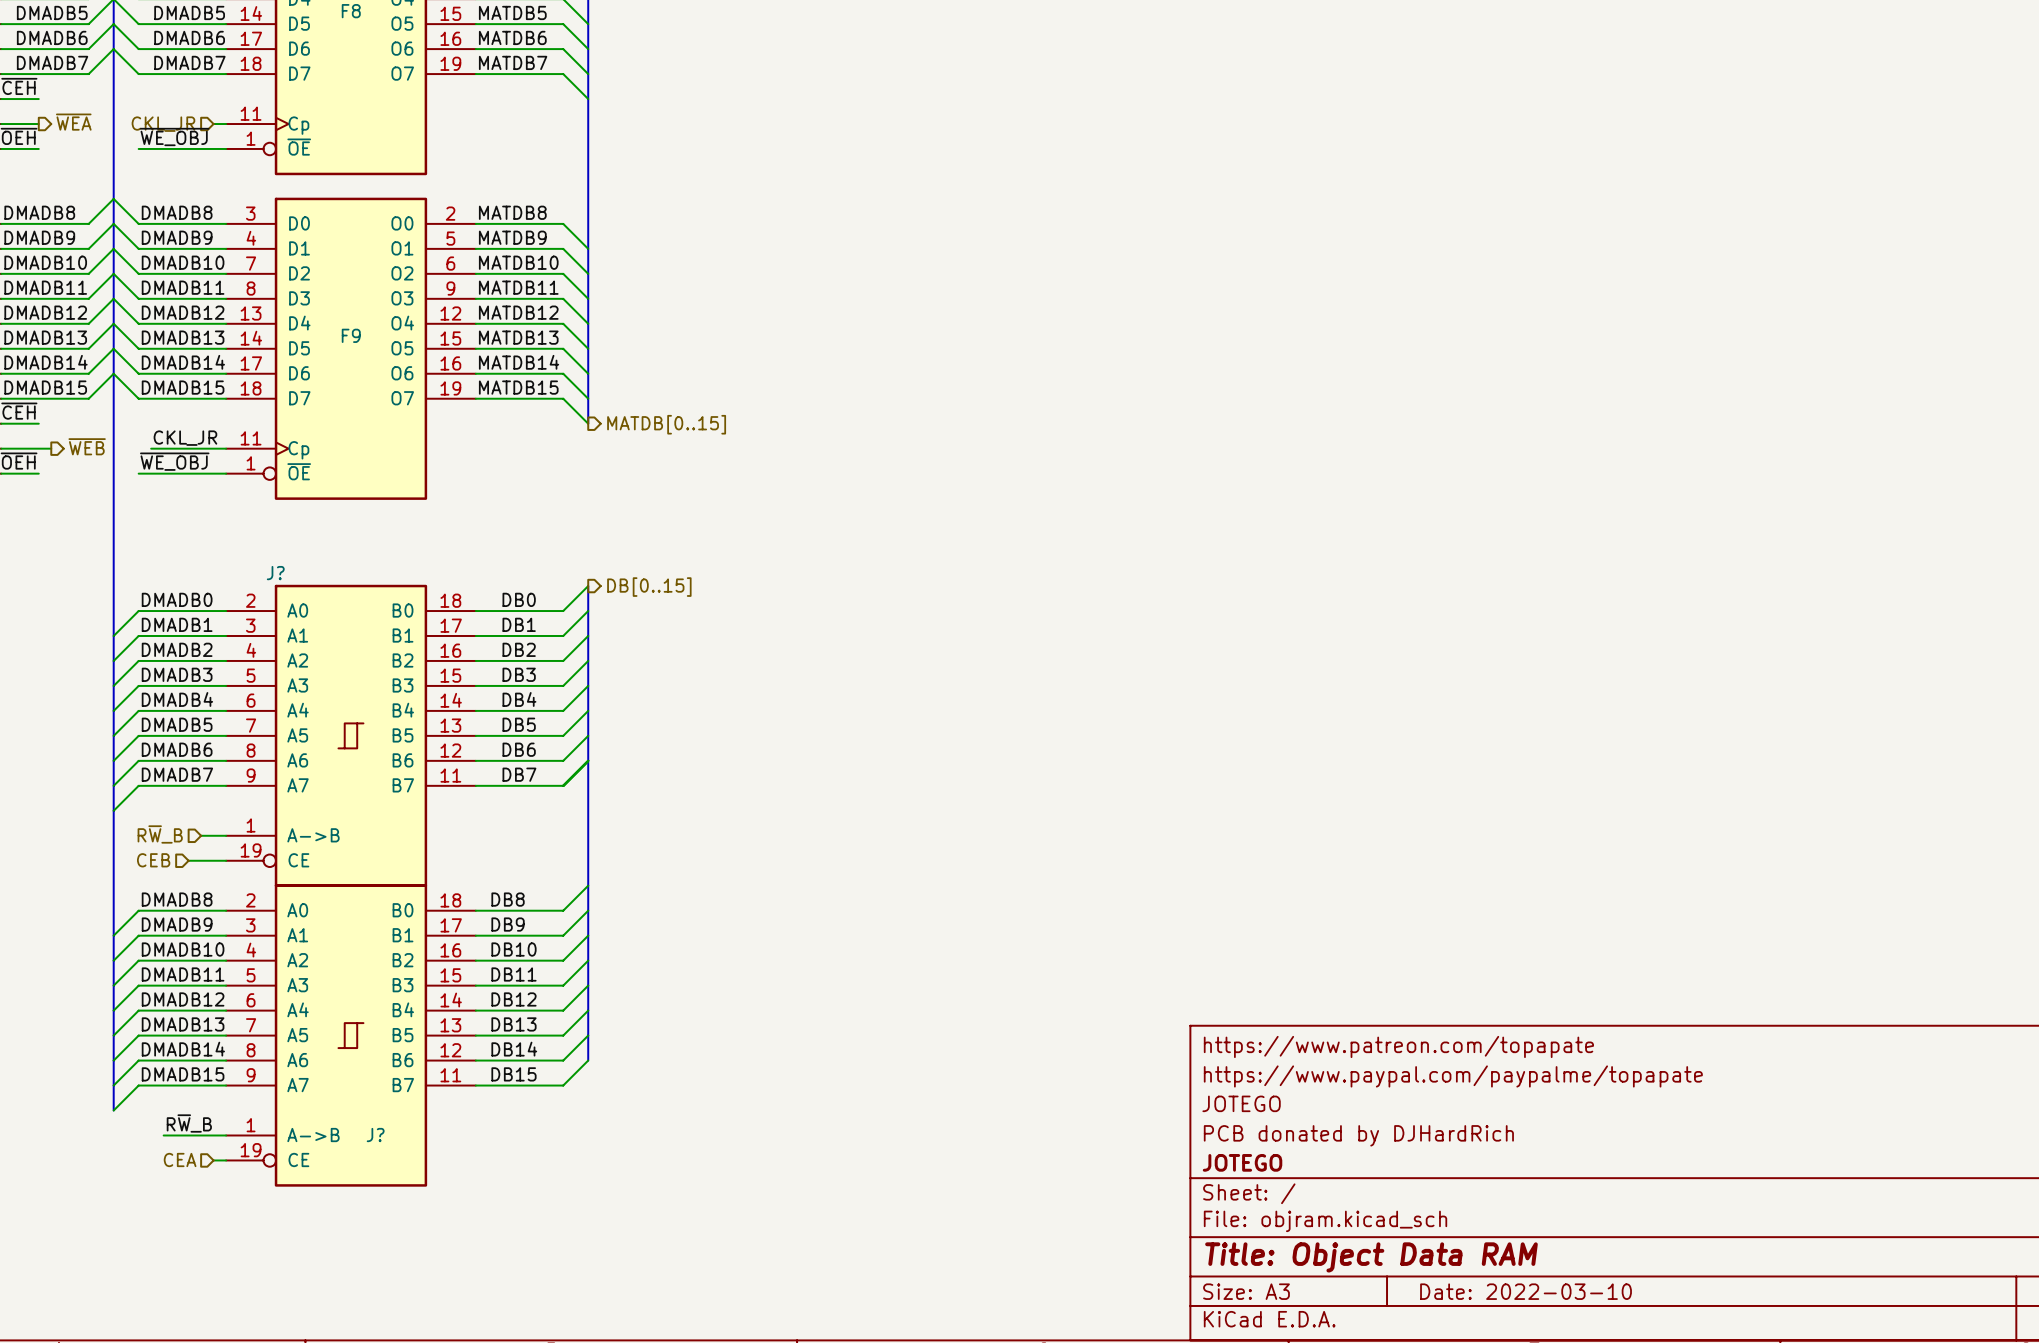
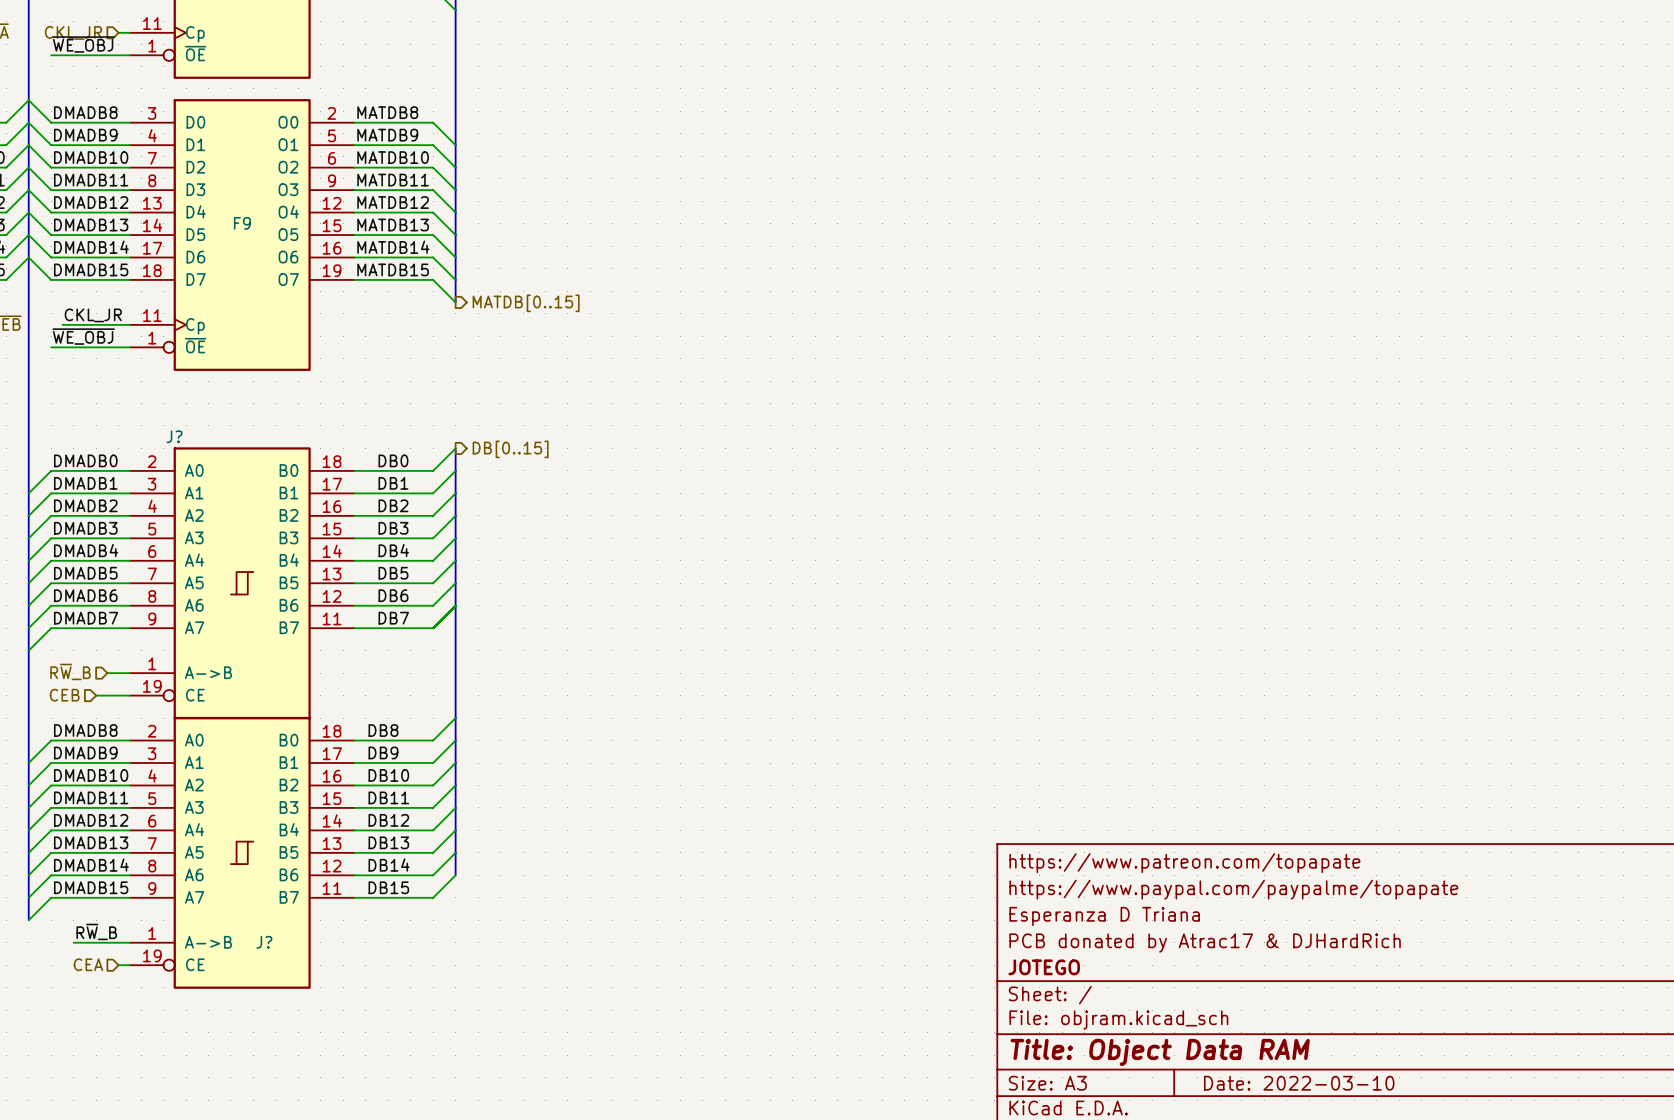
title block: JOTEGO (1241, 1103) -> Esperanza D Triana (1104, 916)
title block: PCB donated by DJHardRich (1358, 1135) -> PCB donated by Atrac17 & DJHardRich (1205, 943)

